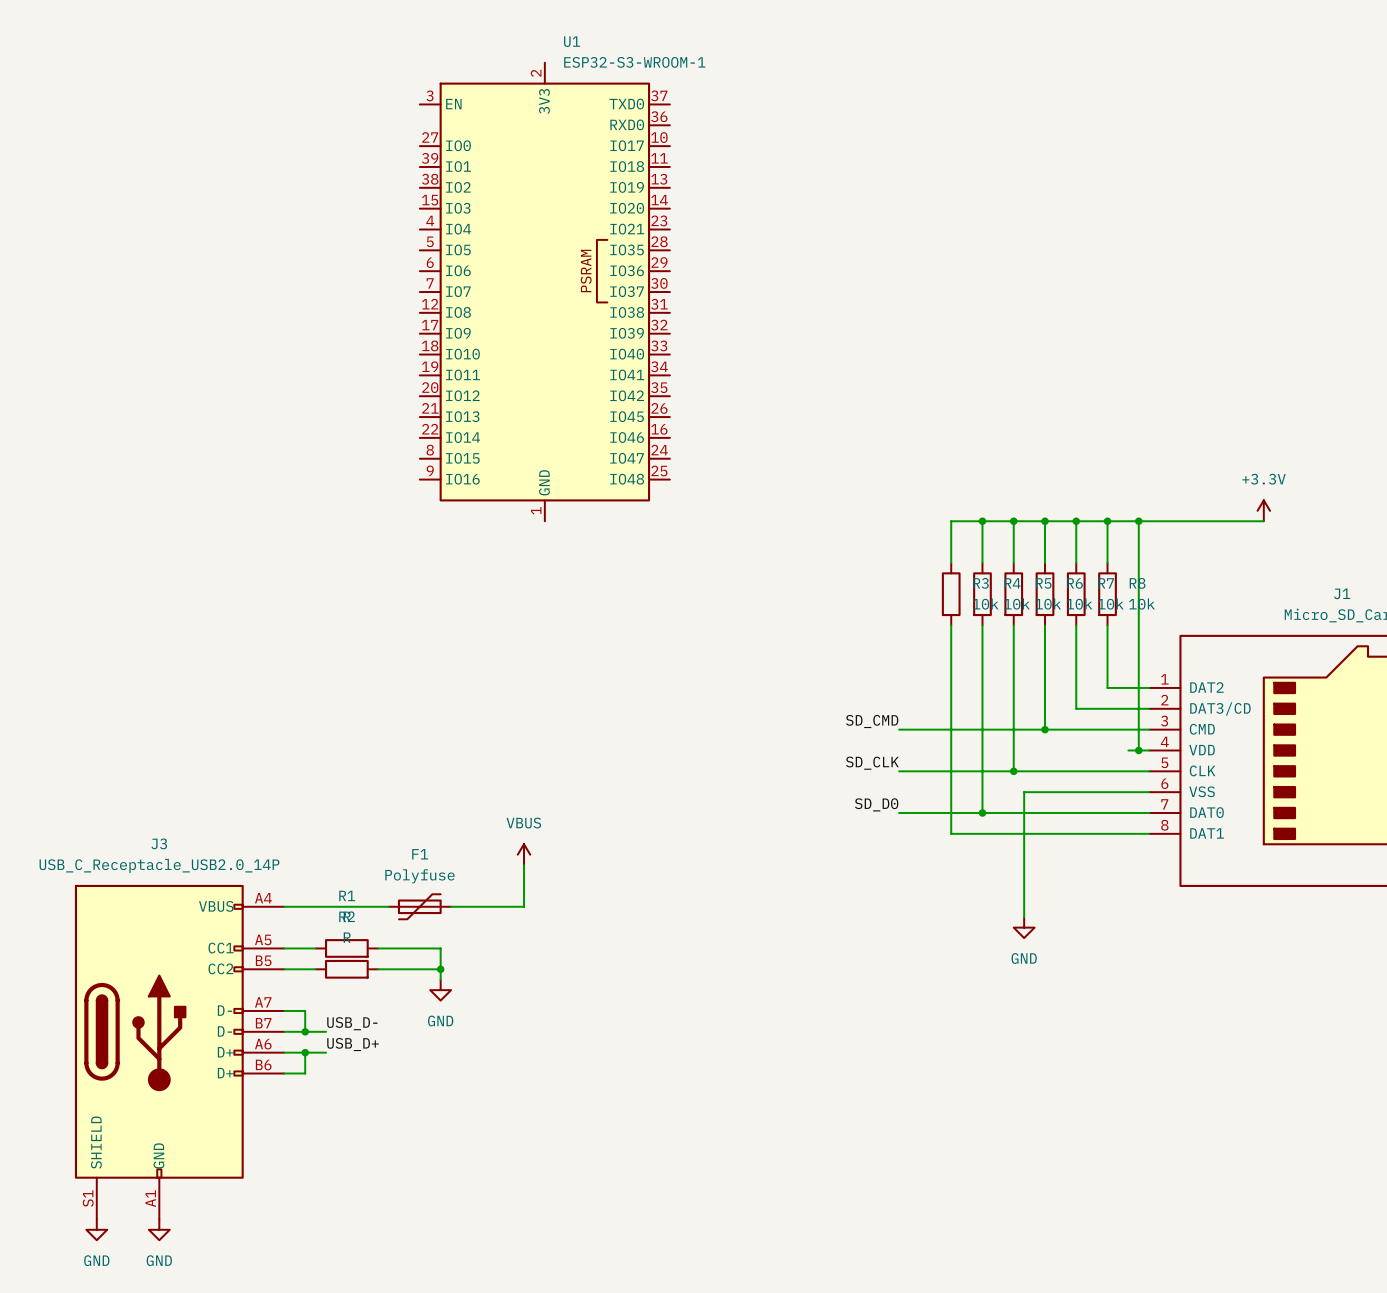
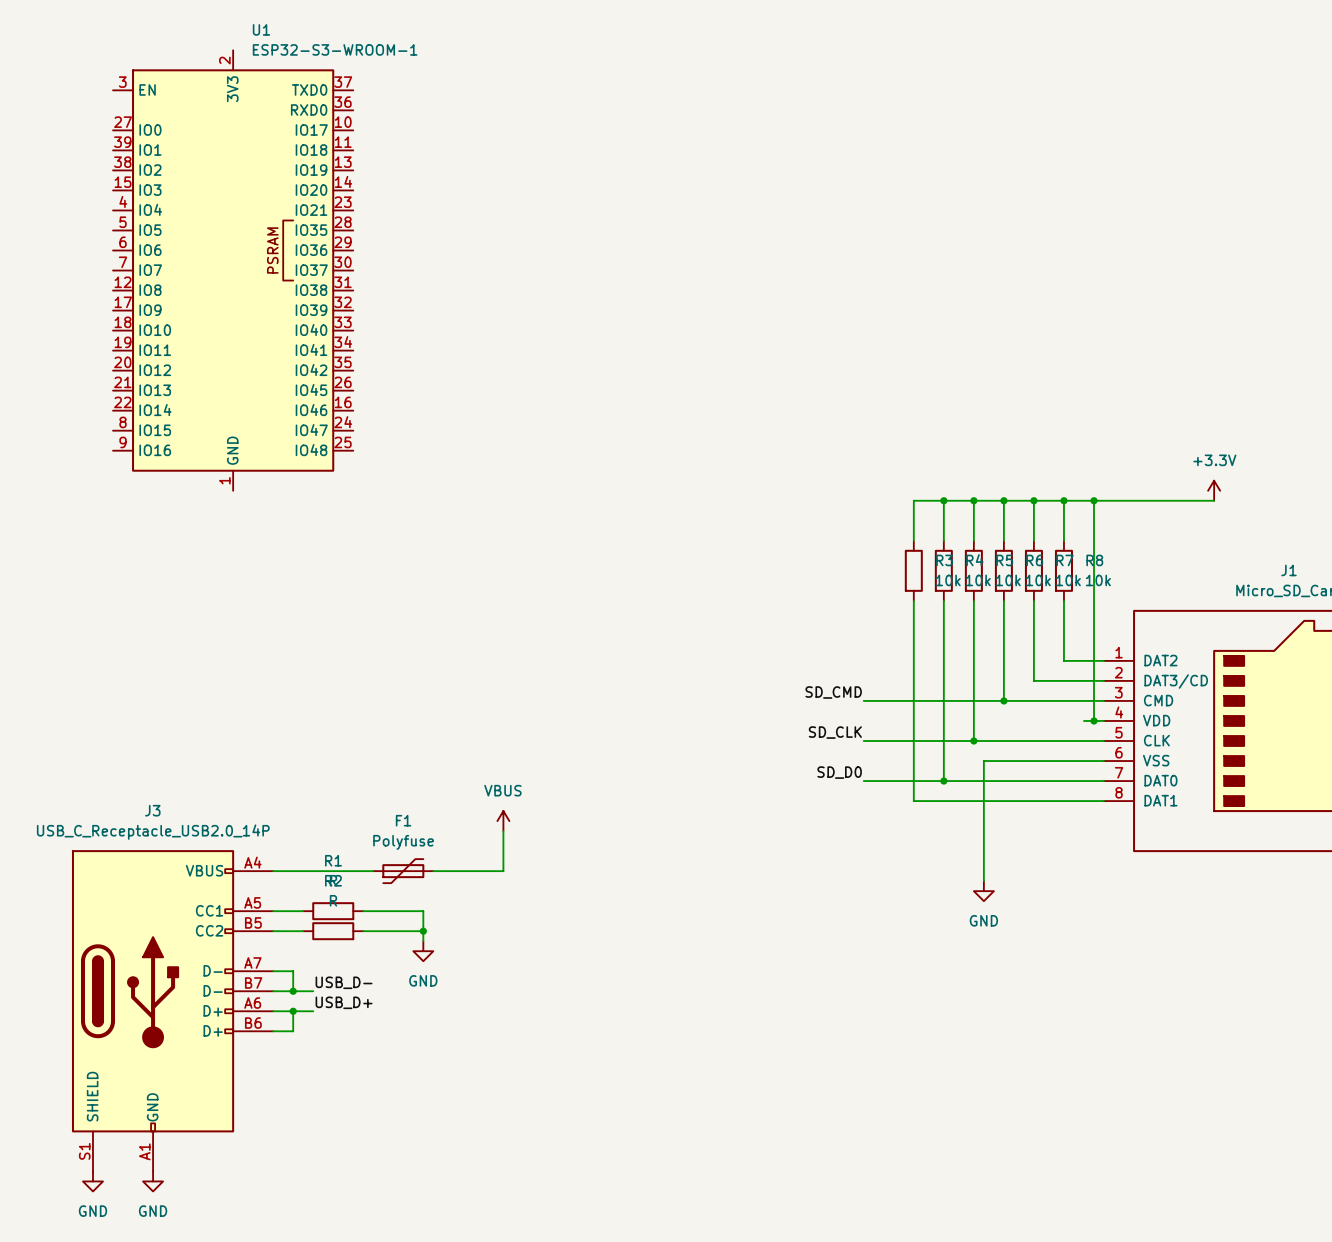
U1 position: (544, 292) -> (233, 270)

